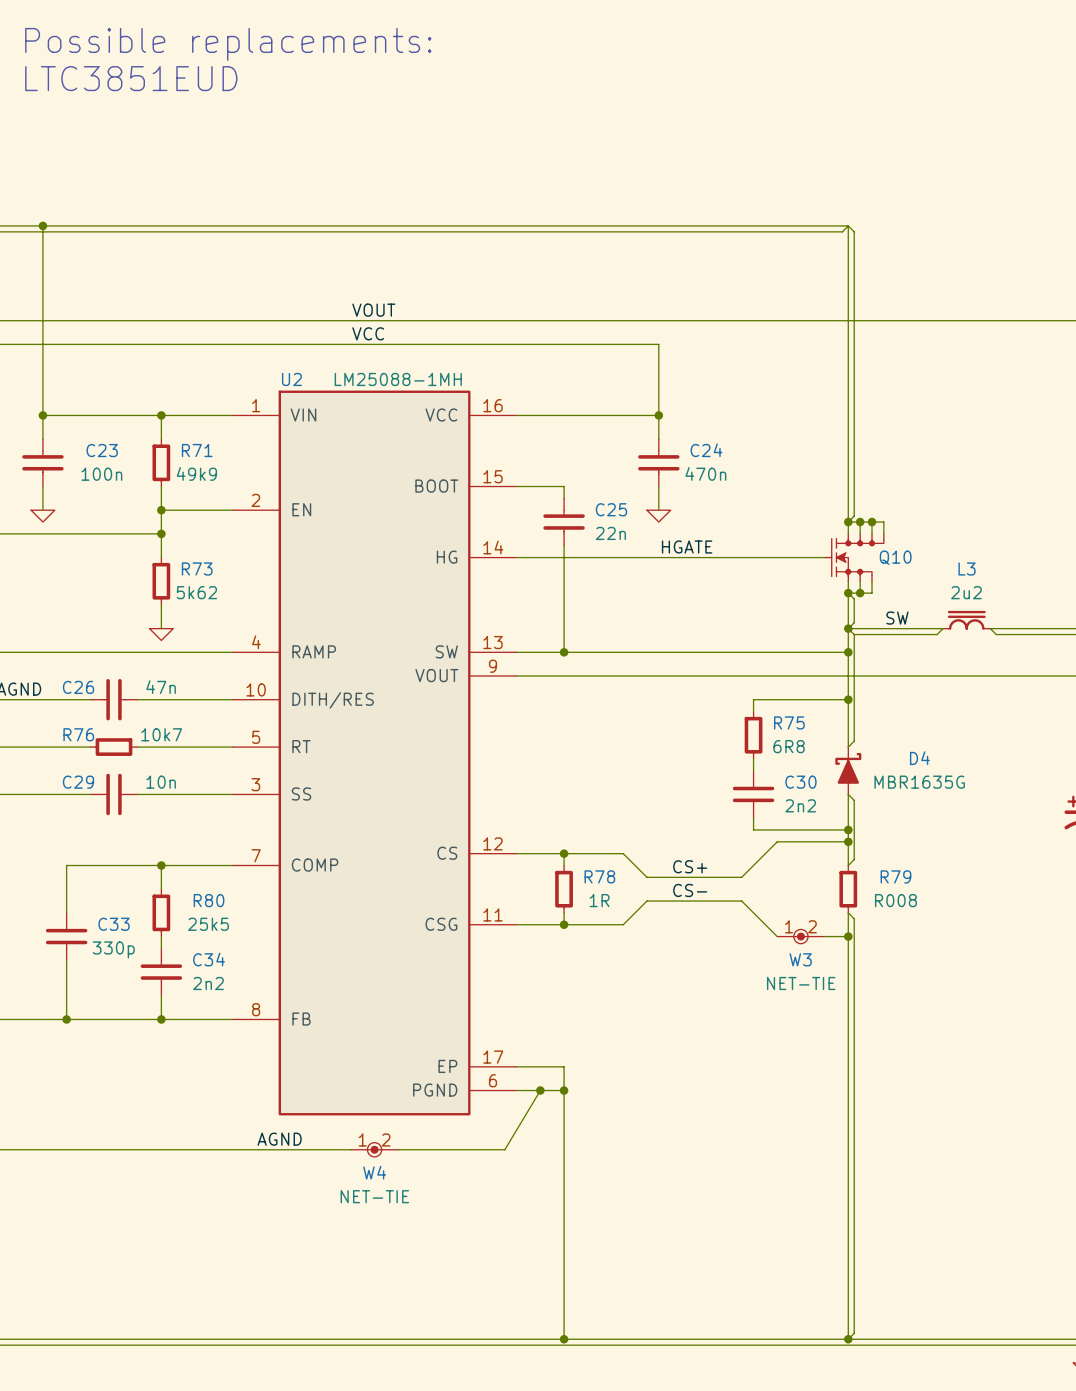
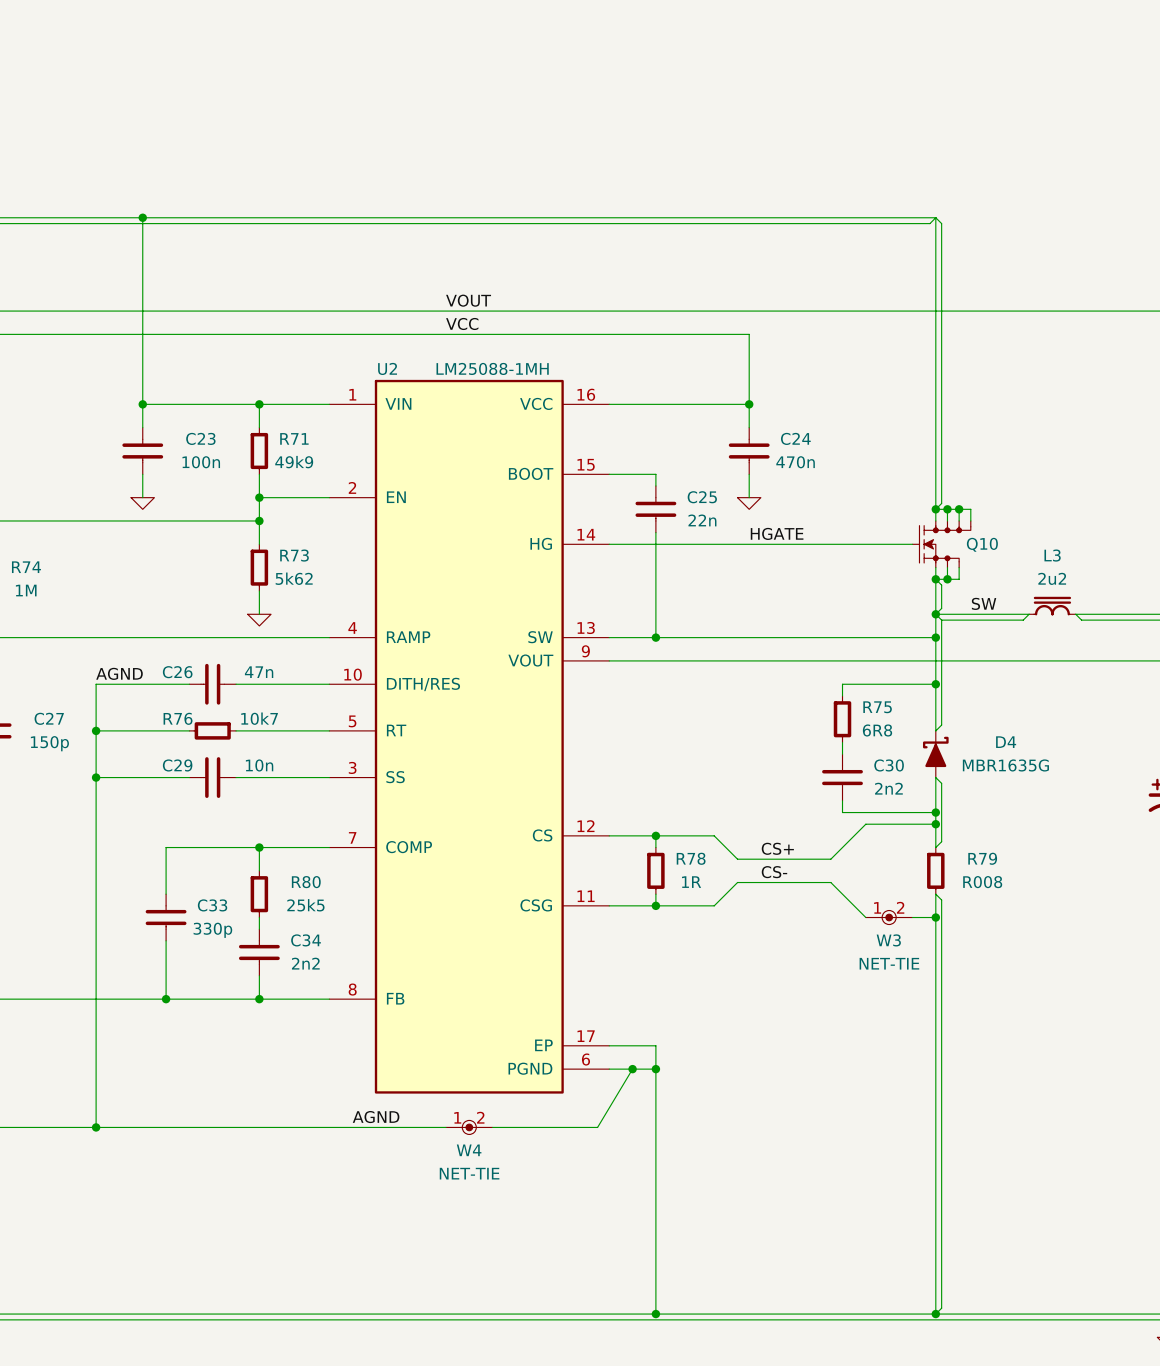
text: Possible replacements: (228, 44) -> none
text: LTC3851EUD (131, 78) -> none

